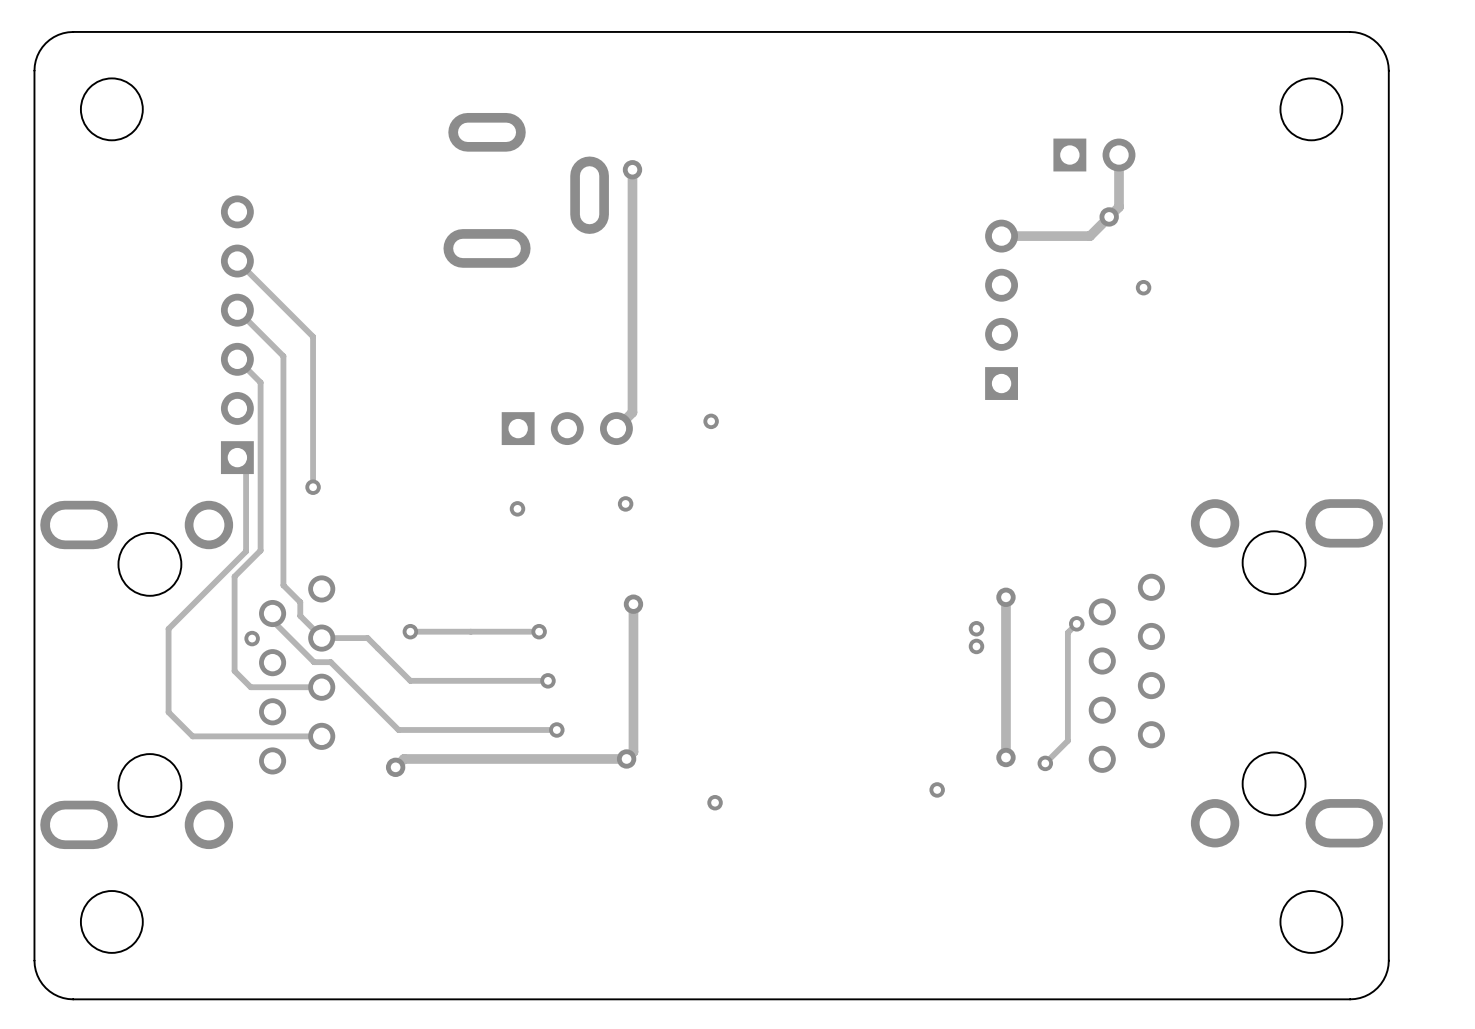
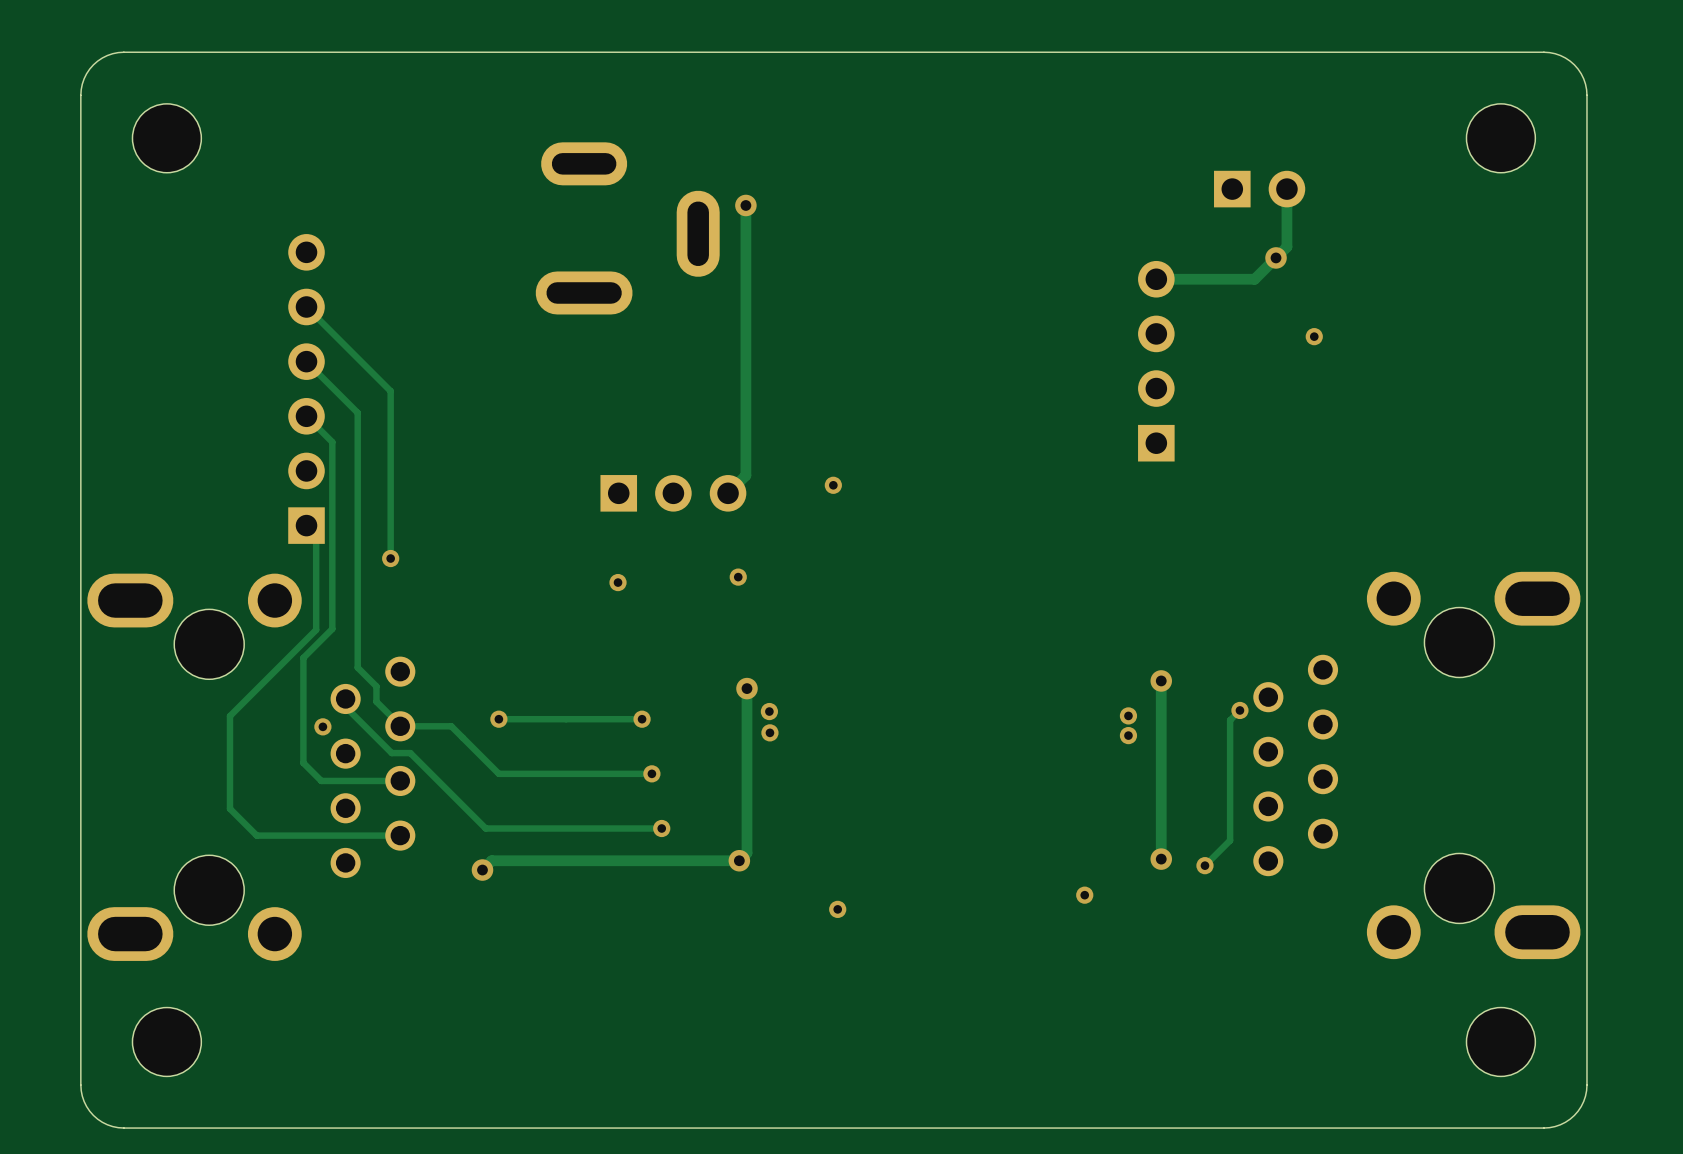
via: none -> (769, 711)
via: none -> (769, 732)

